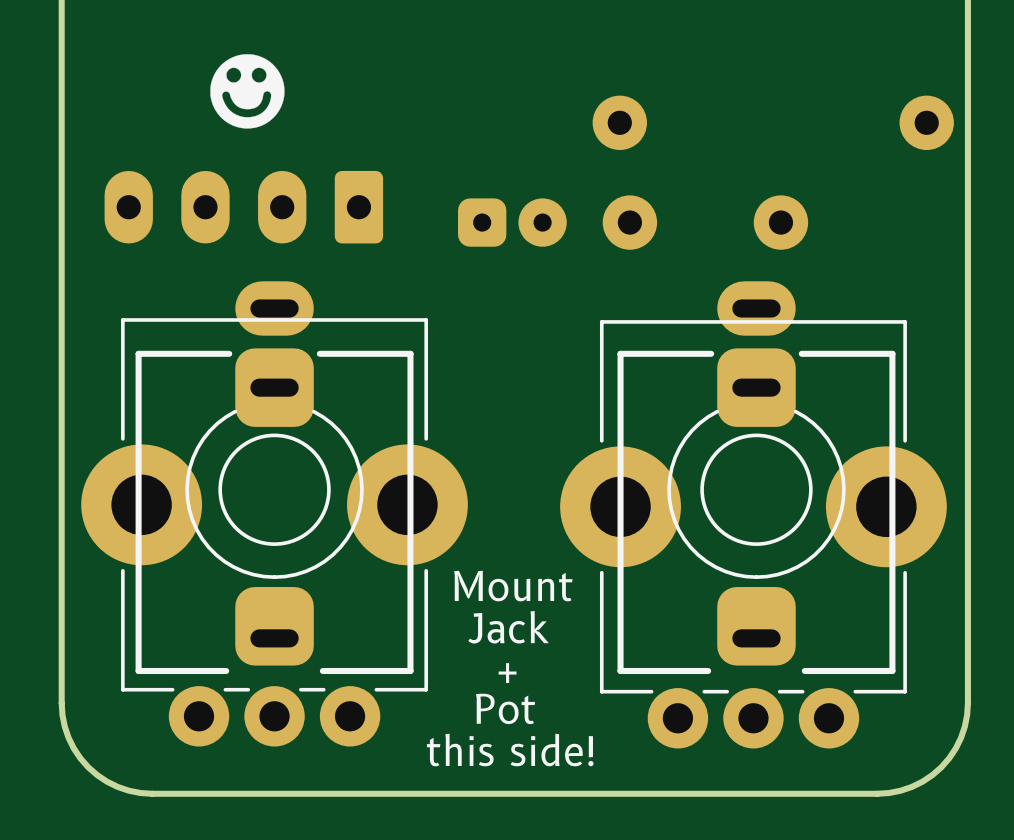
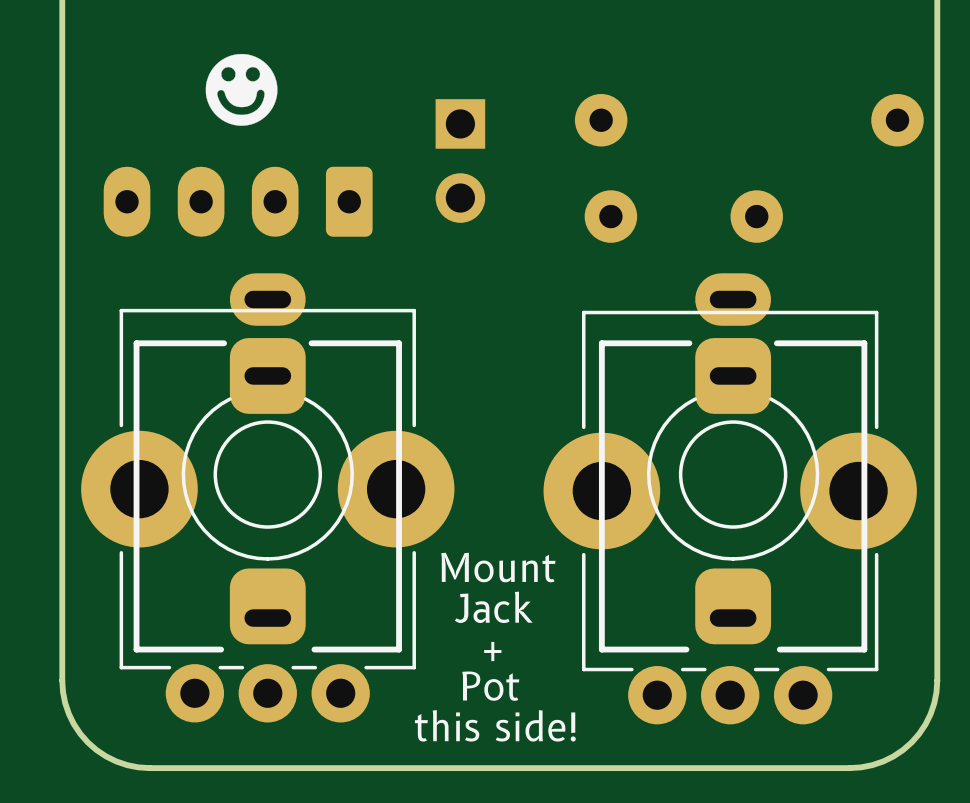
part: none -> (460, 160)
part: (512, 222) -> none

